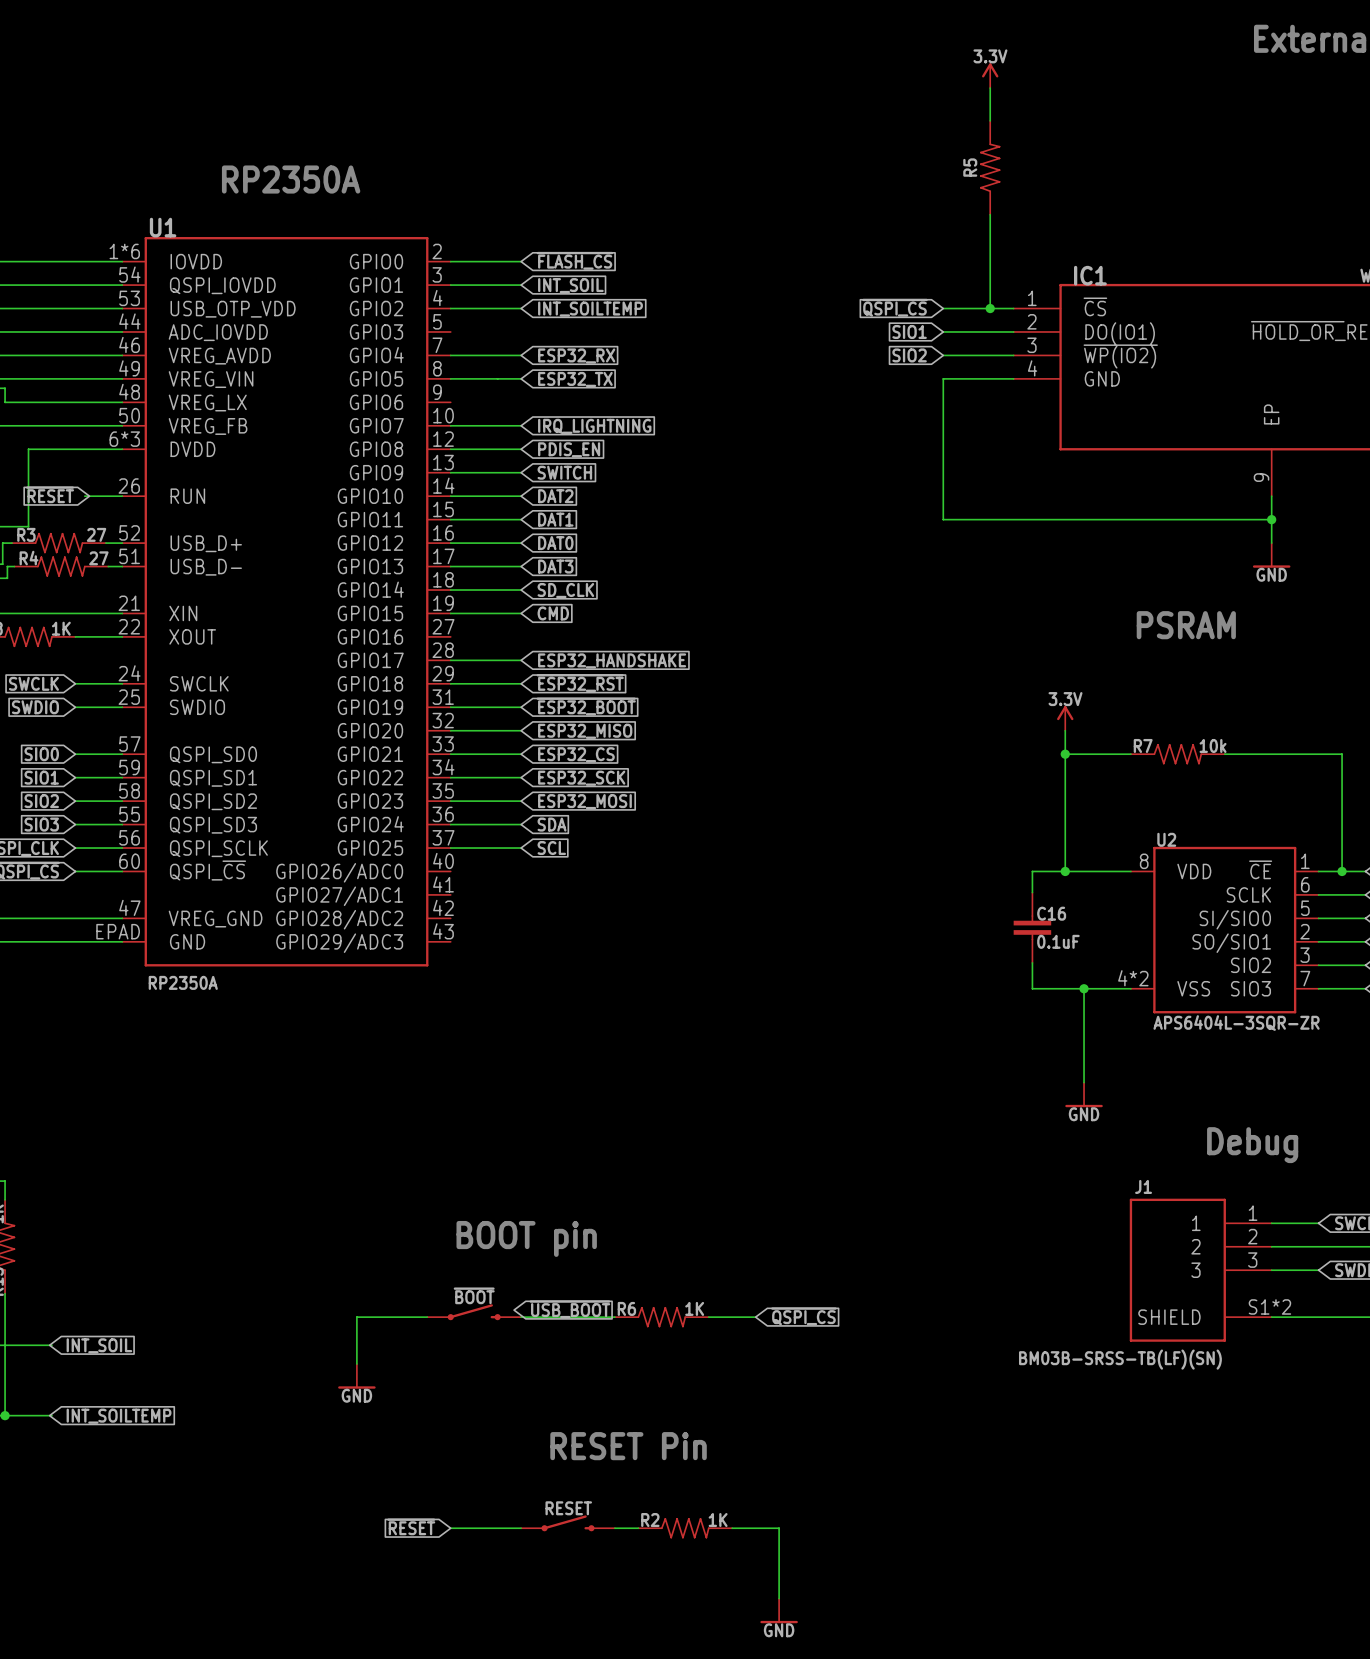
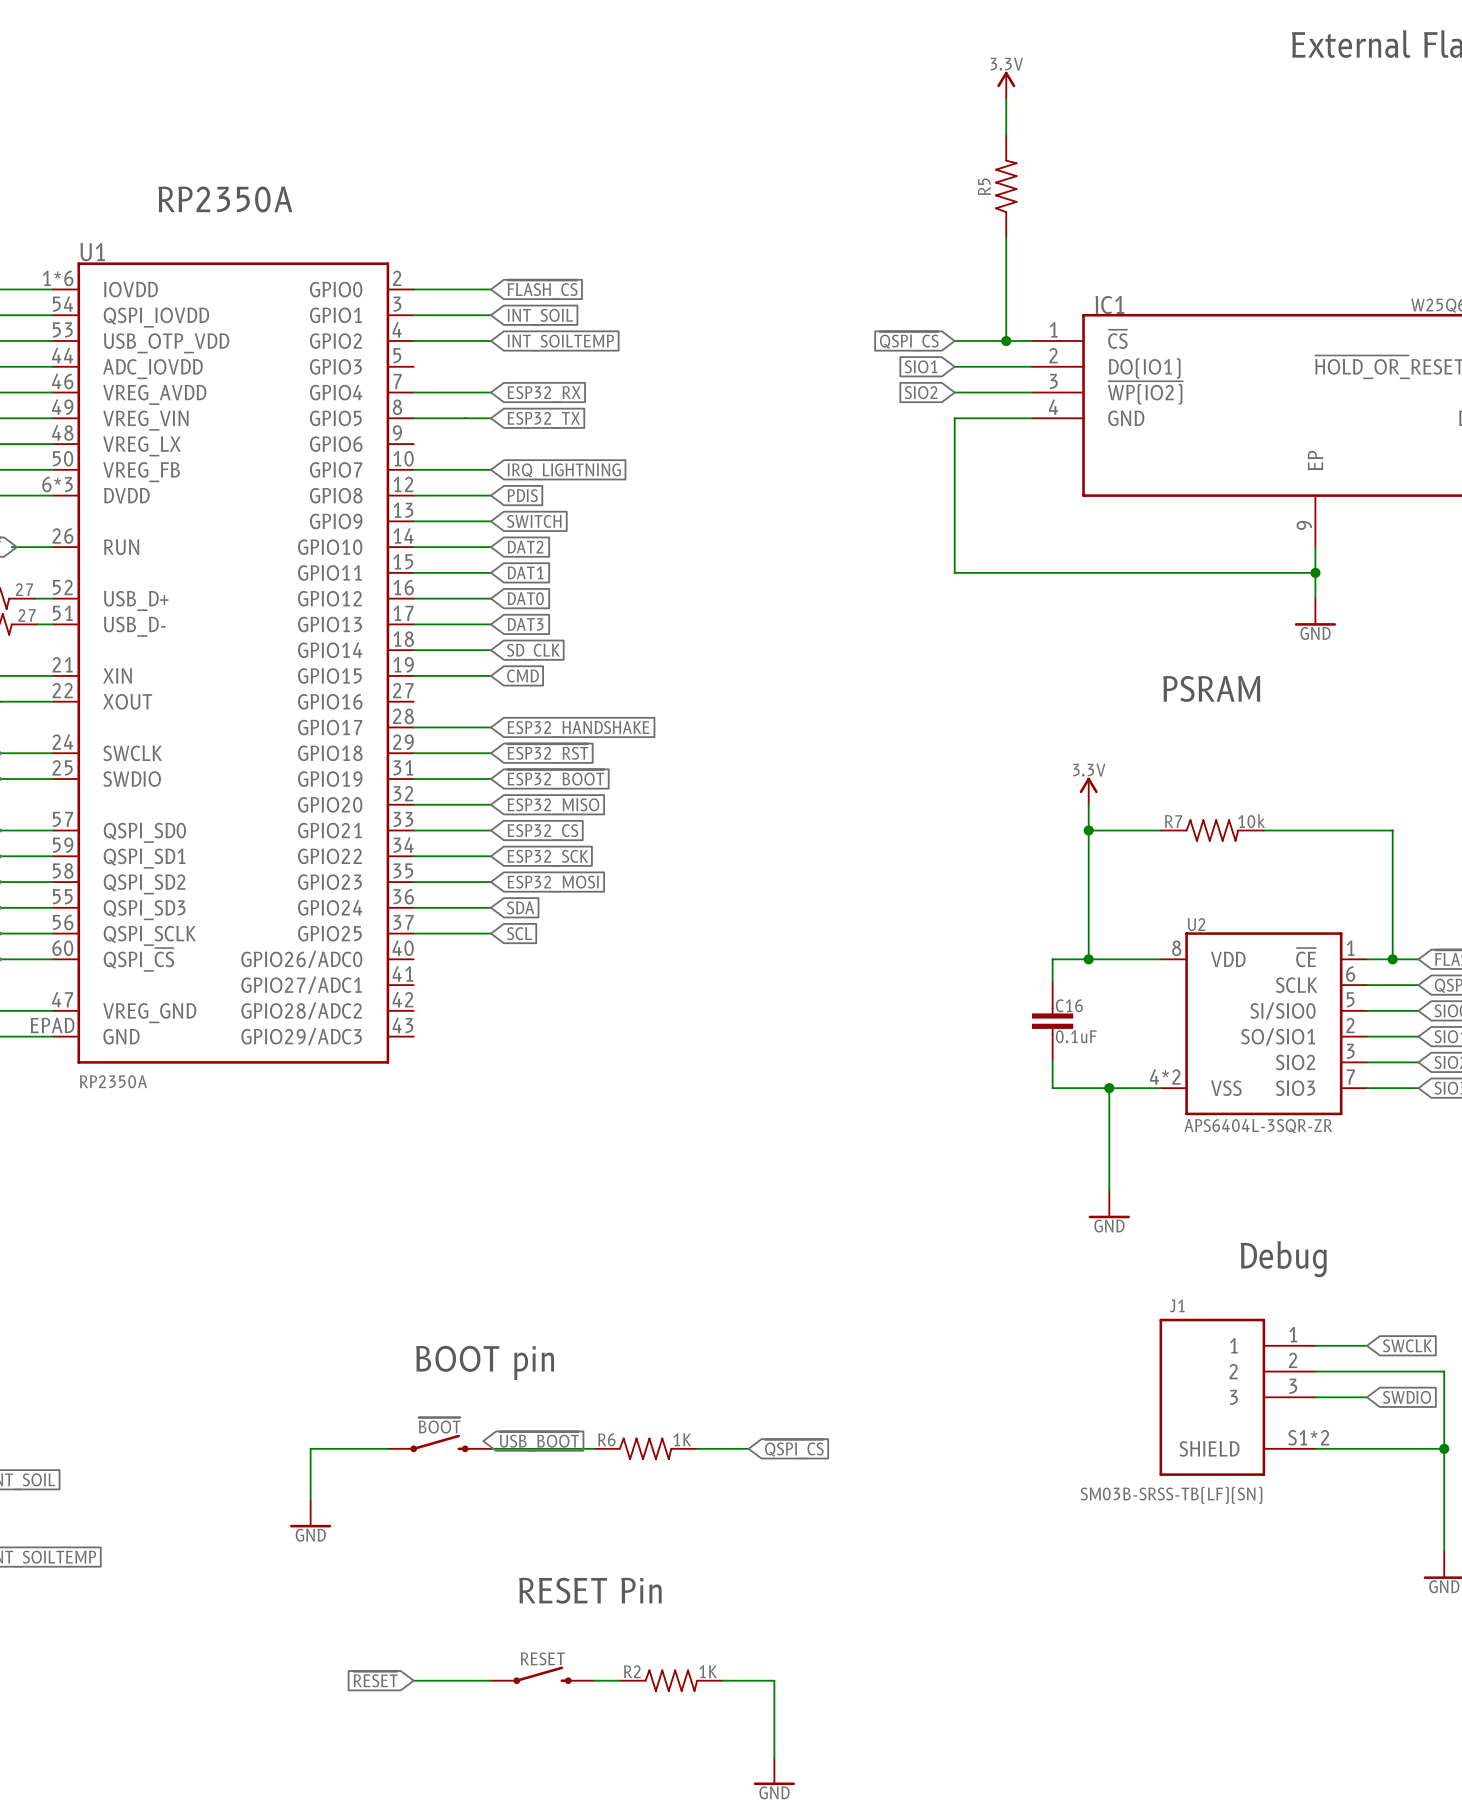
global label: PDIS_EN (569, 449) -> PDIS (522, 495)
J1 value: BM03B-SRSS-TB(LF)(SN) (1120, 1359) -> SM03B-SRSS-TB(LF)(SN) (1171, 1495)

